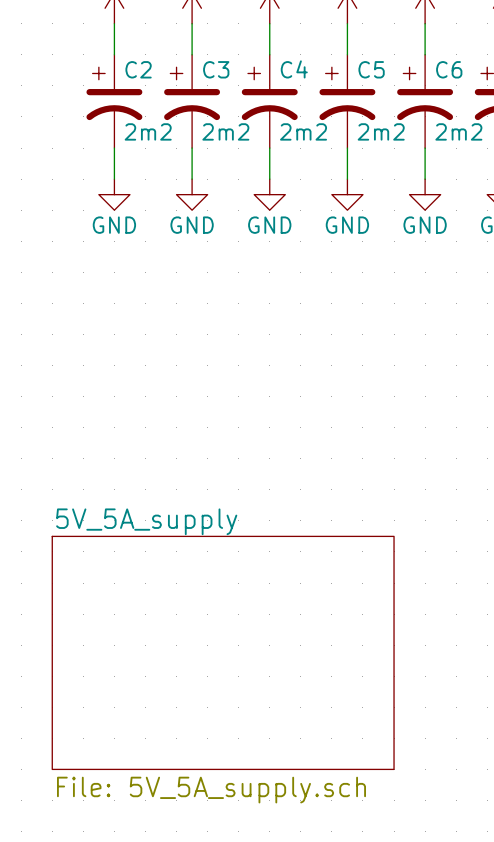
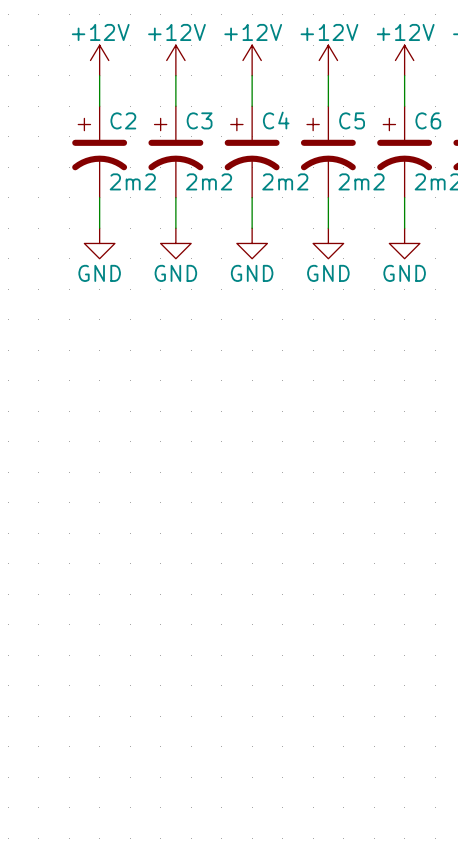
sheet 5V_5A_supply: File: 5V_5A_supply.sch (223, 652) -> none

